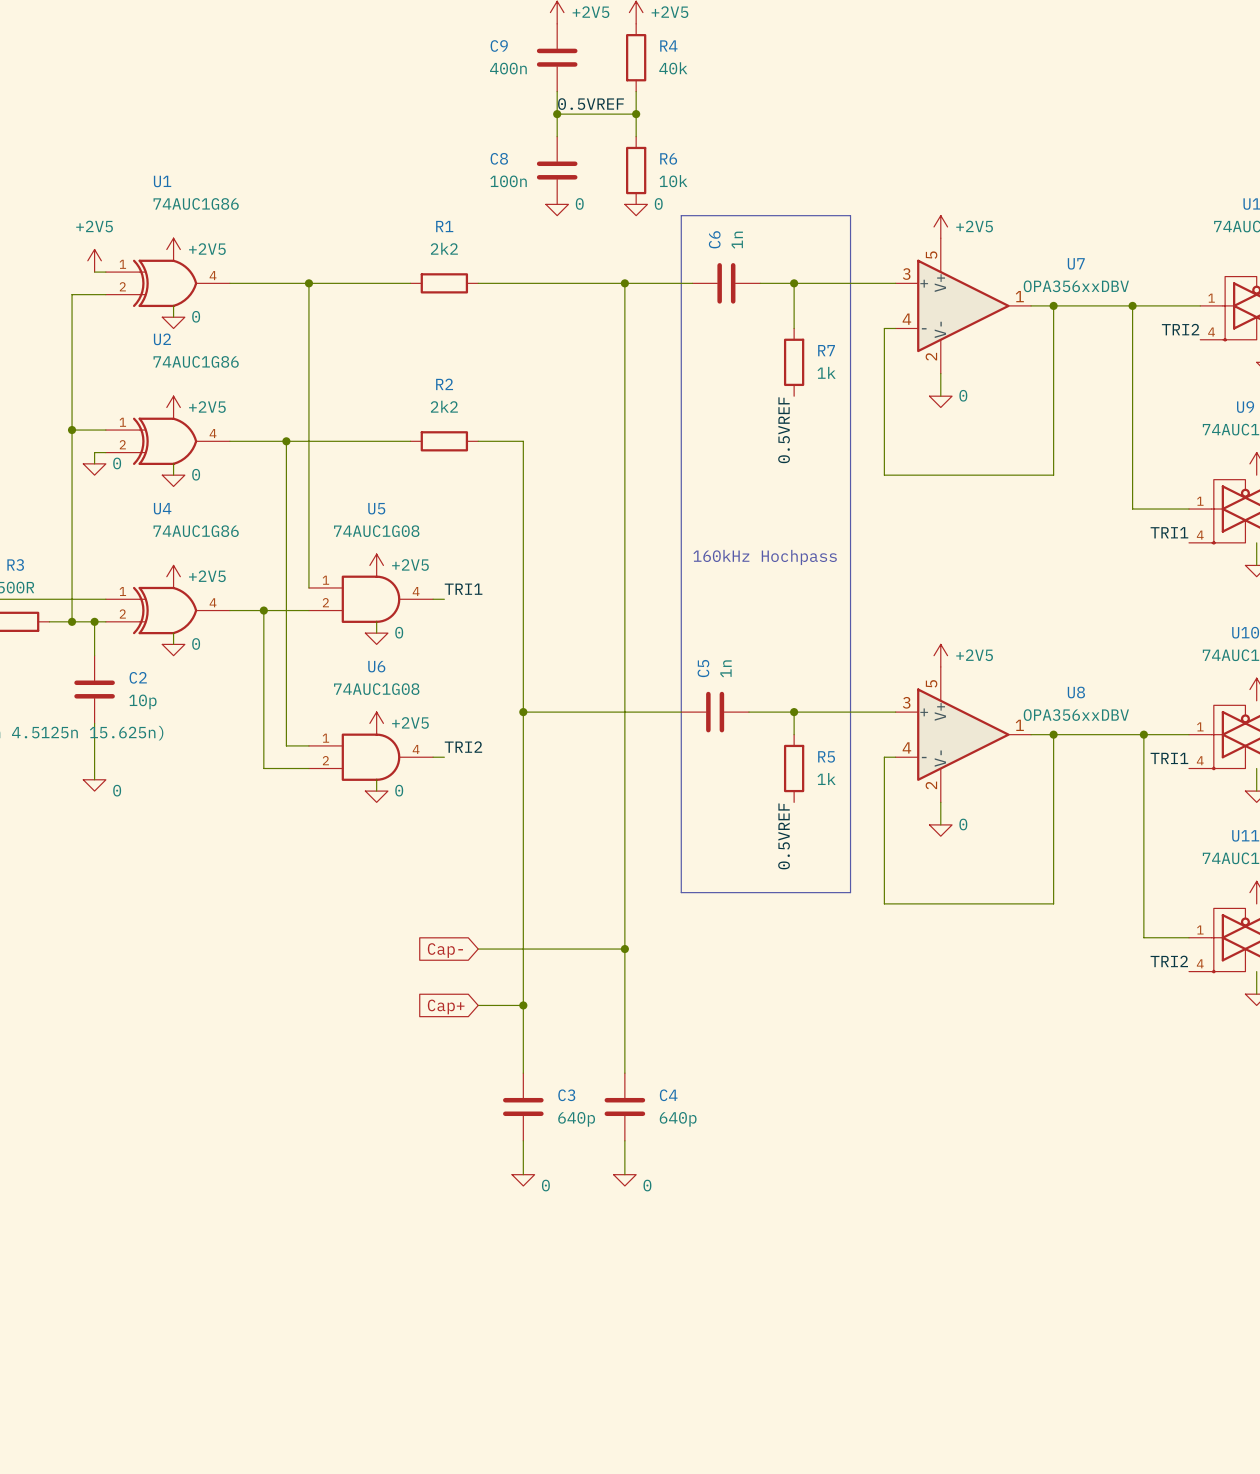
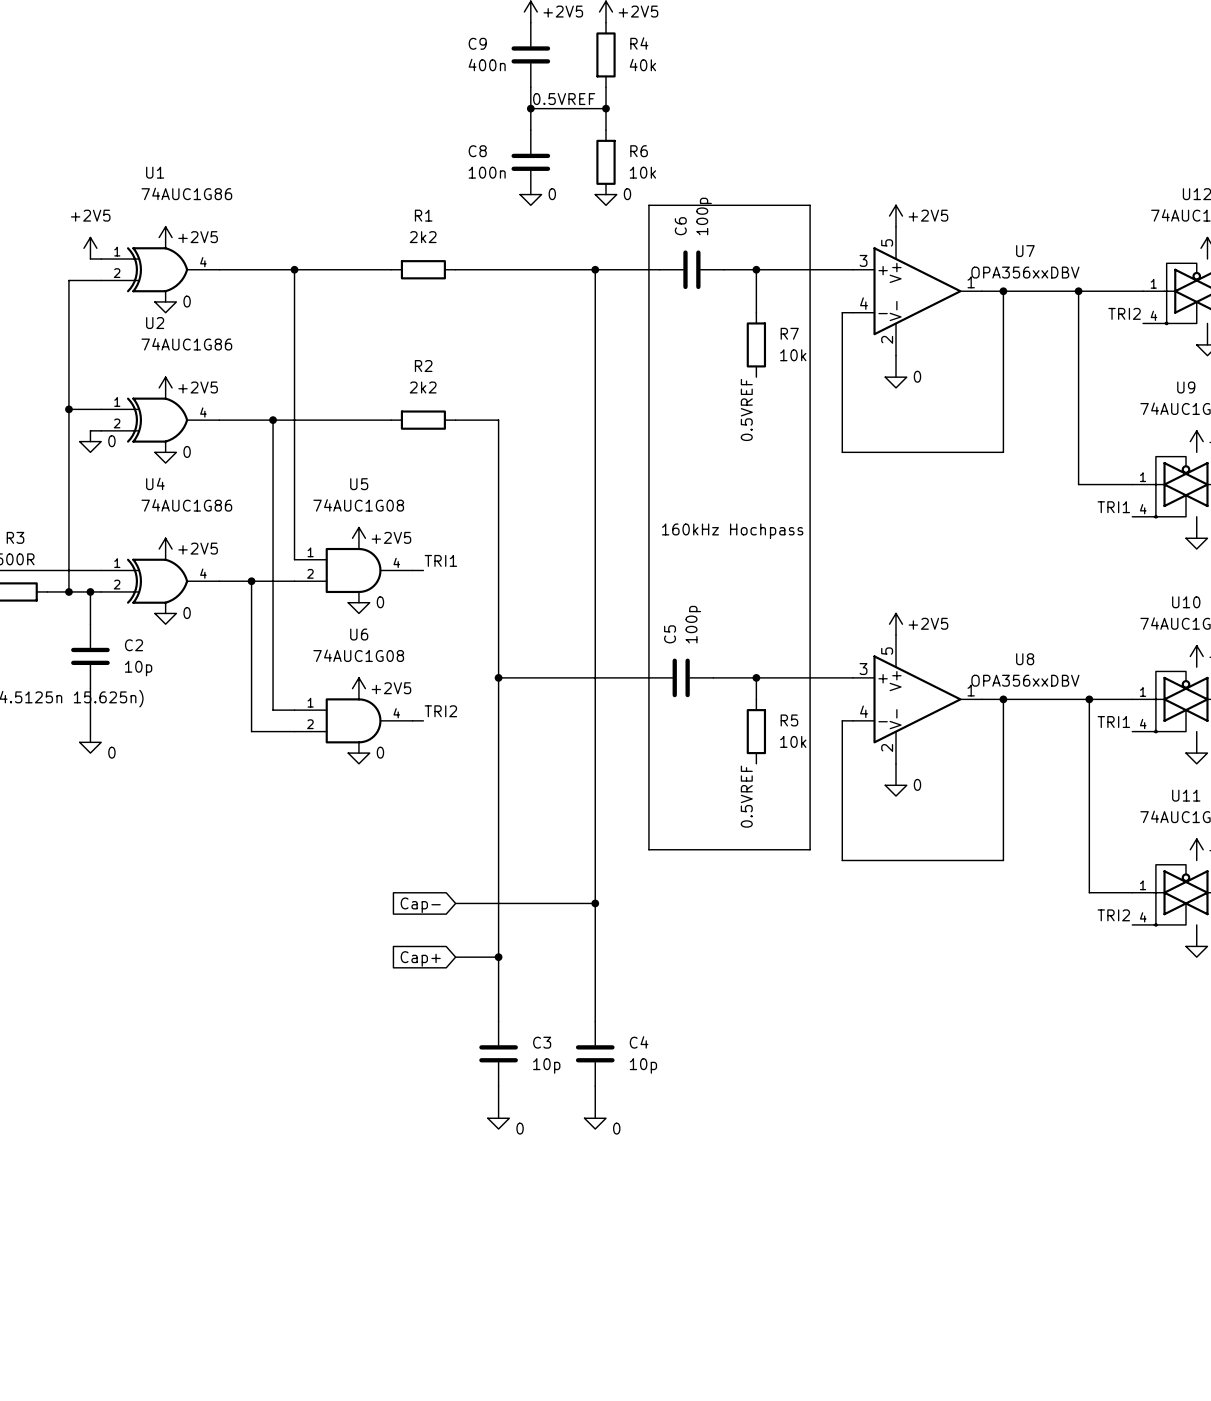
C6 value: 1n (737, 240) -> 100p (704, 216)
R7 value: 1k (826, 372) -> 10k (793, 355)
C5 value: 1n (725, 668) -> 100p (693, 624)
R5 value: 1k (826, 779) -> 10k (793, 741)
C3 value: 640p (576, 1119) -> 10p (546, 1065)
C4 value: 640p (678, 1119) -> 10p (643, 1065)

